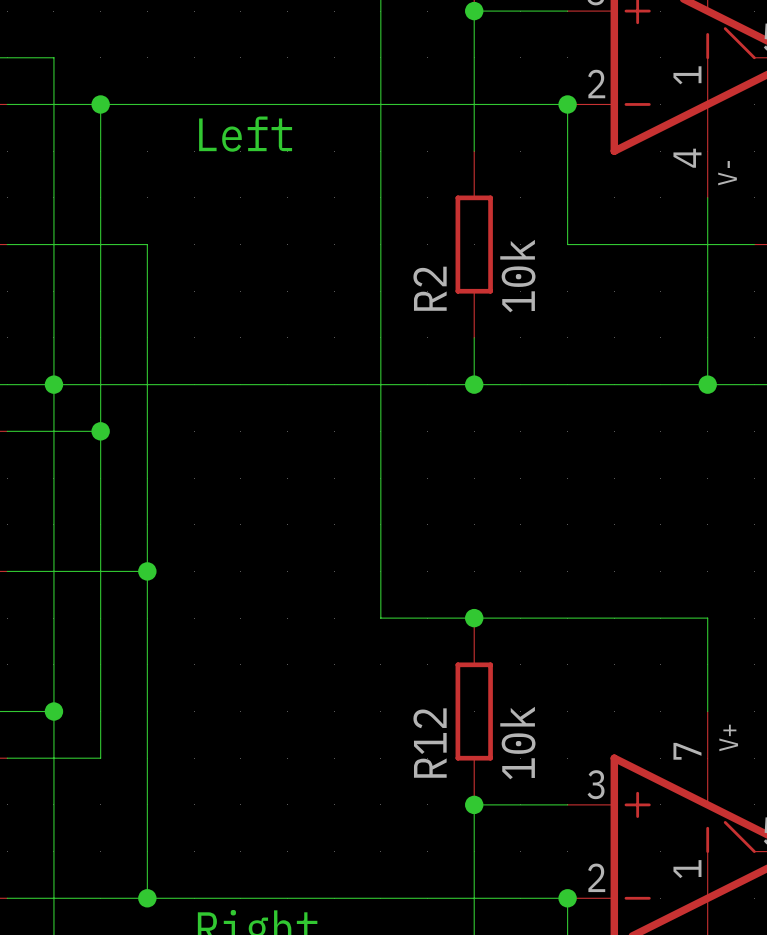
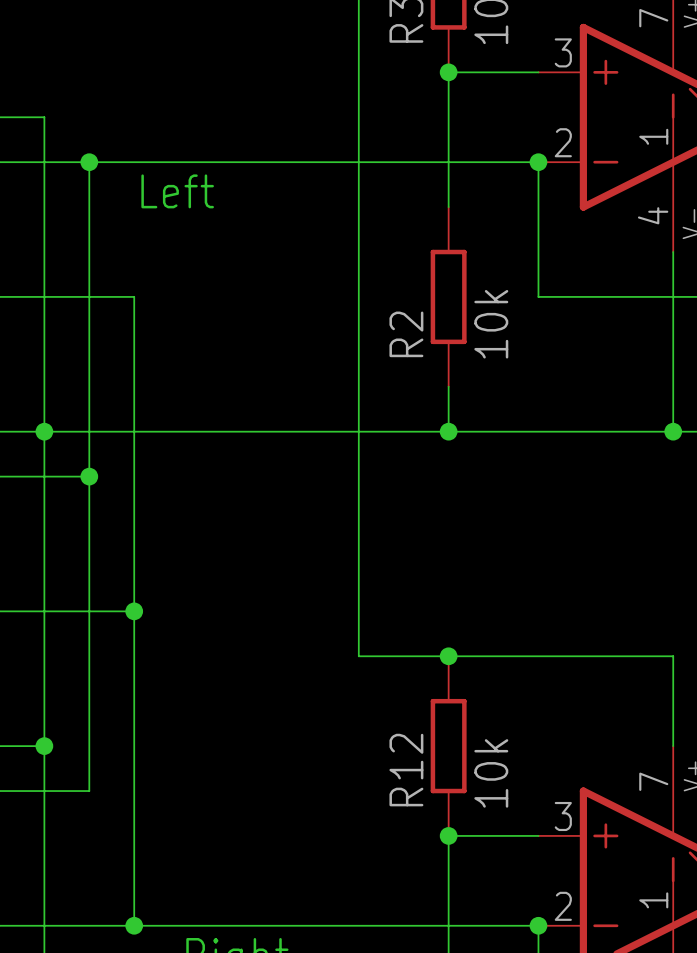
text position: Left (245, 134) -> Left (177, 191)

